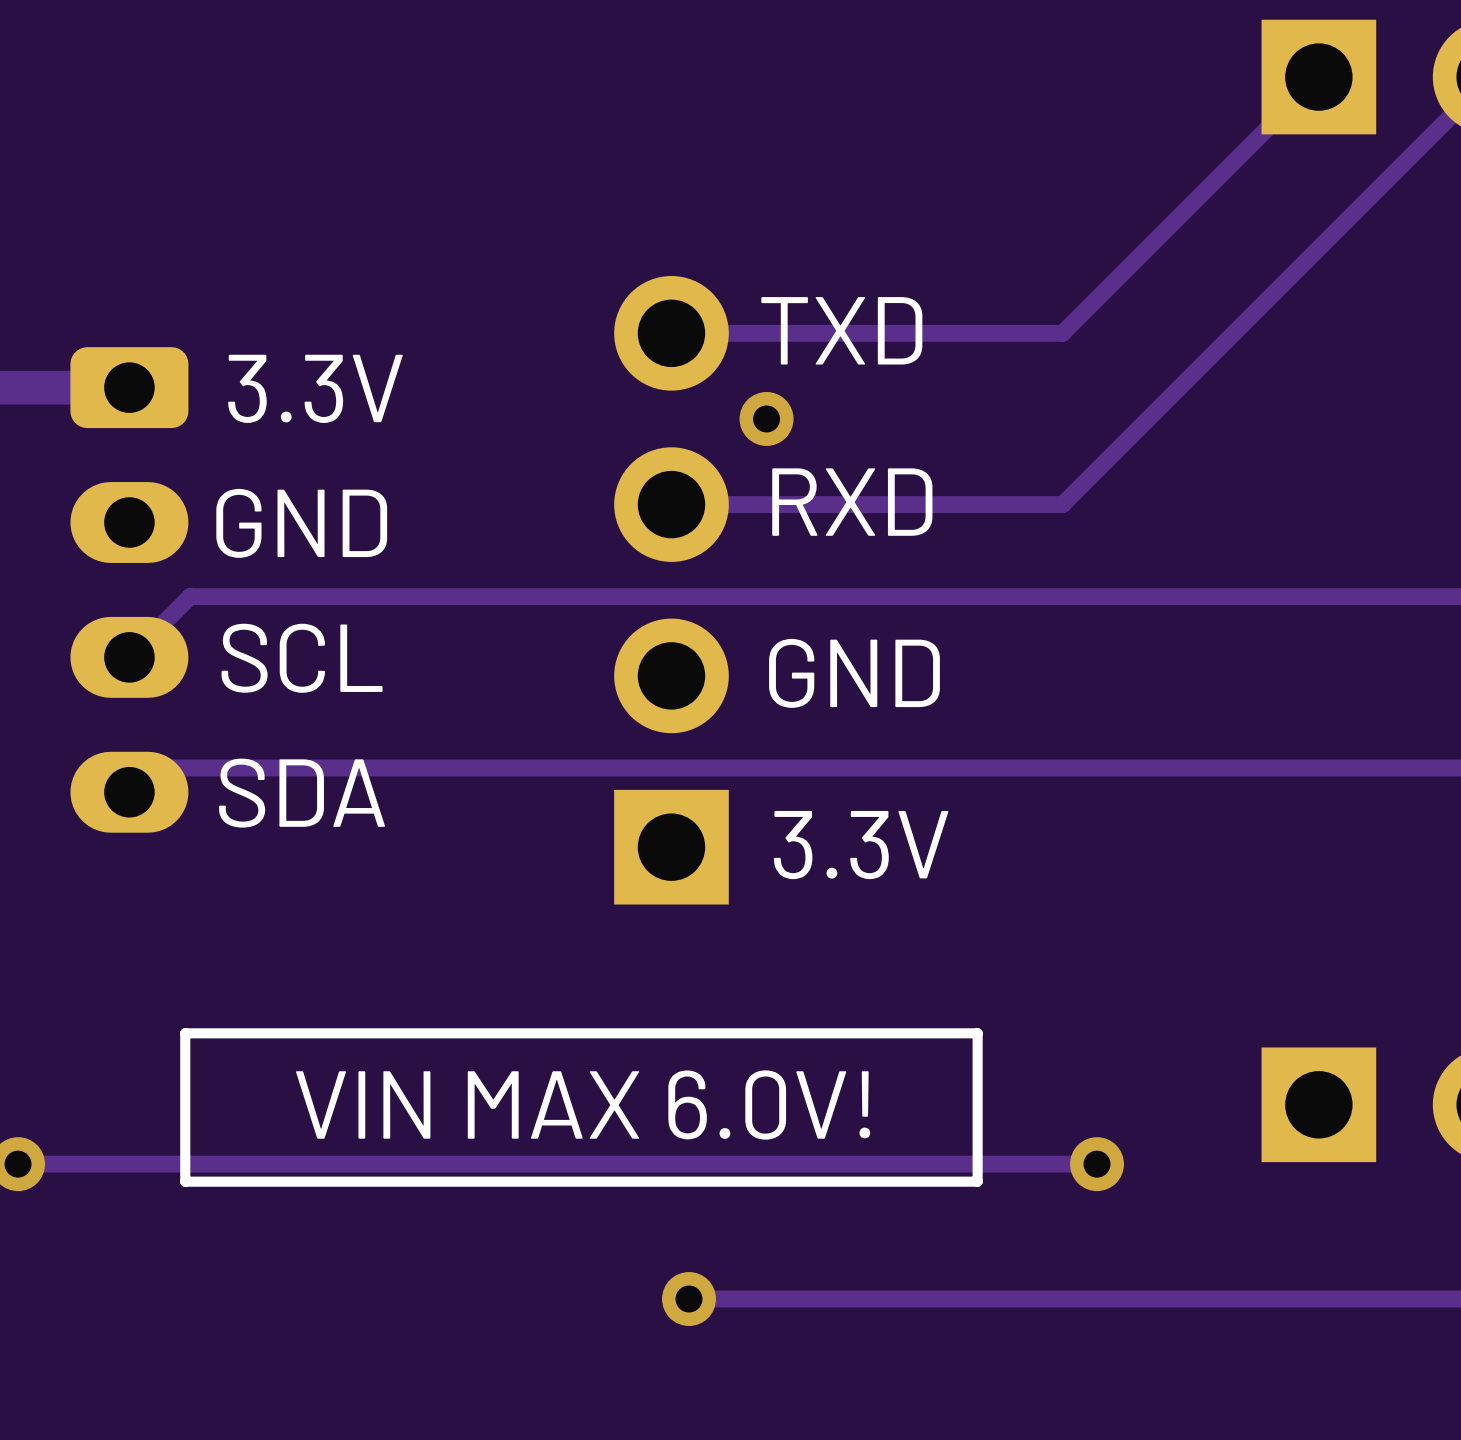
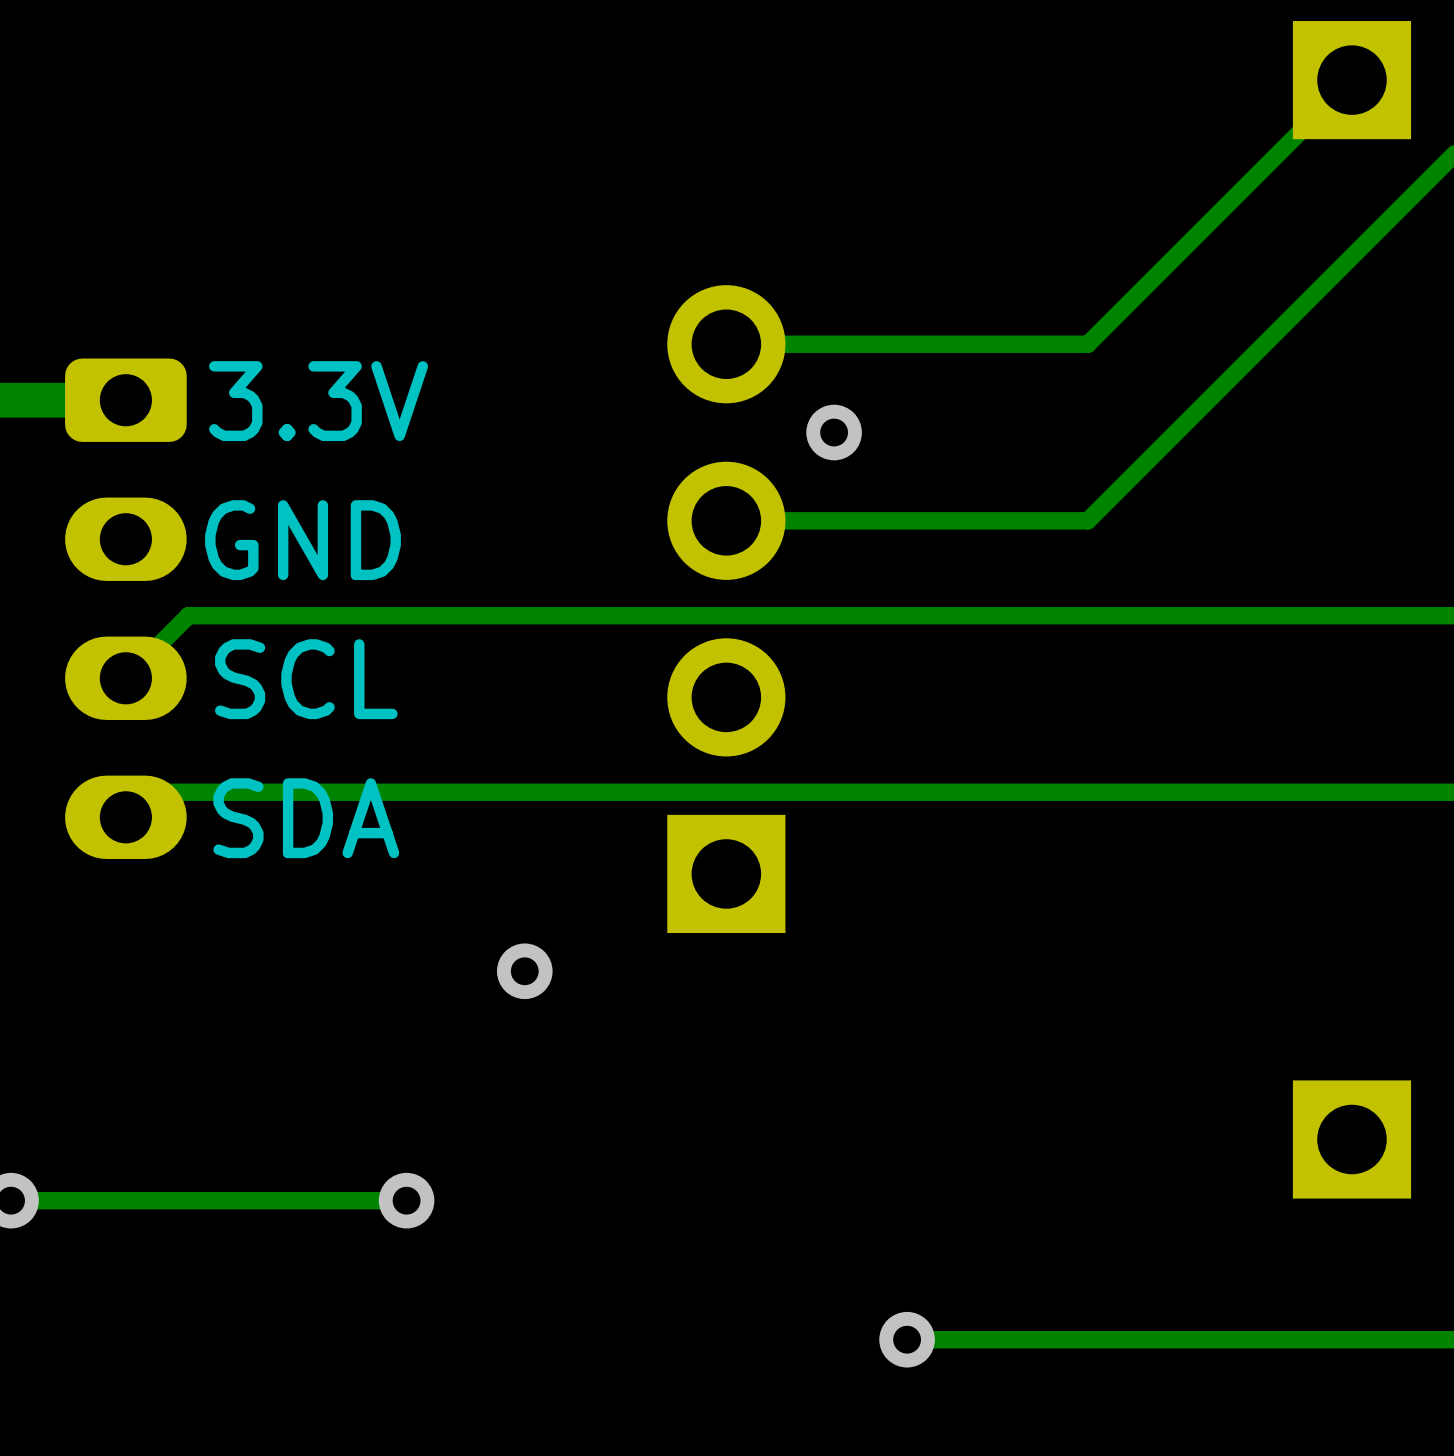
text: TXD (841, 330) -> none
via position: (766, 418) -> (834, 432)
text: RXD (852, 502) -> none
part position: (671, 590) -> (726, 609)
text: GND (854, 673) -> none
text: 3.3V (861, 845) -> none
via: none -> (524, 971)
line: (977, 1033) (977, 1181) (185, 1181) (185, 1033) (977, 1033) -> none
text: VIN MAX 6.0V! (583, 1105) -> none
via: none -> (406, 1200)
track: (1097, 1164) (401, 1164) -> none
via: (1097, 1164) -> none
via: (689, 1299) -> none
track: (887, 1299) (689, 1299) -> none
via: none -> (907, 1339)

